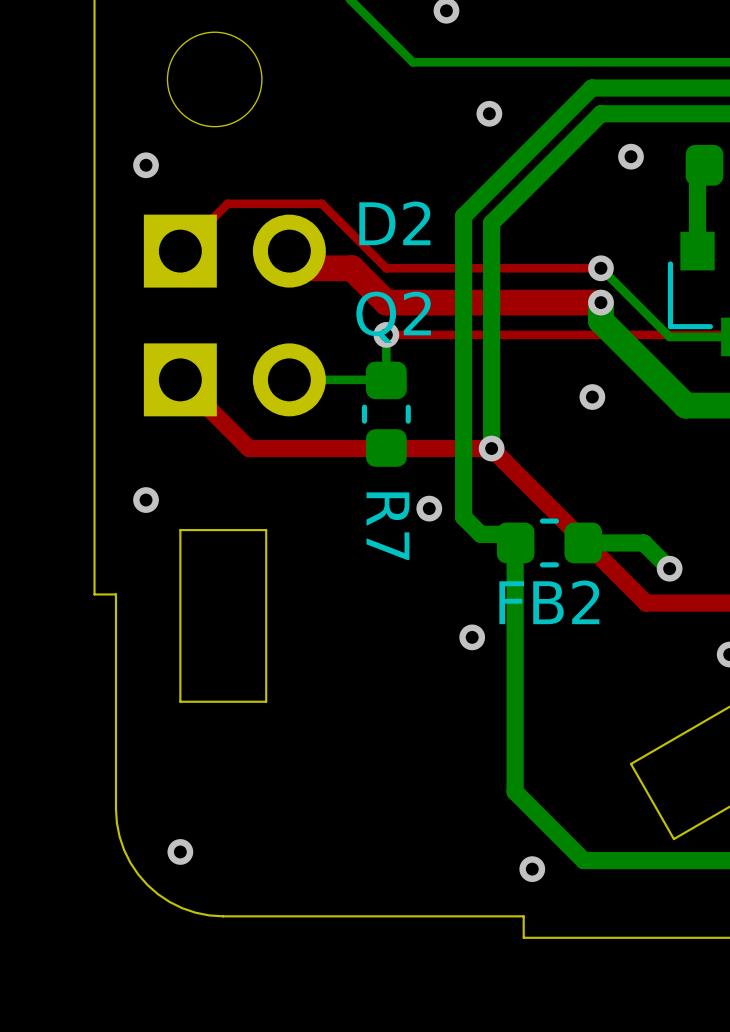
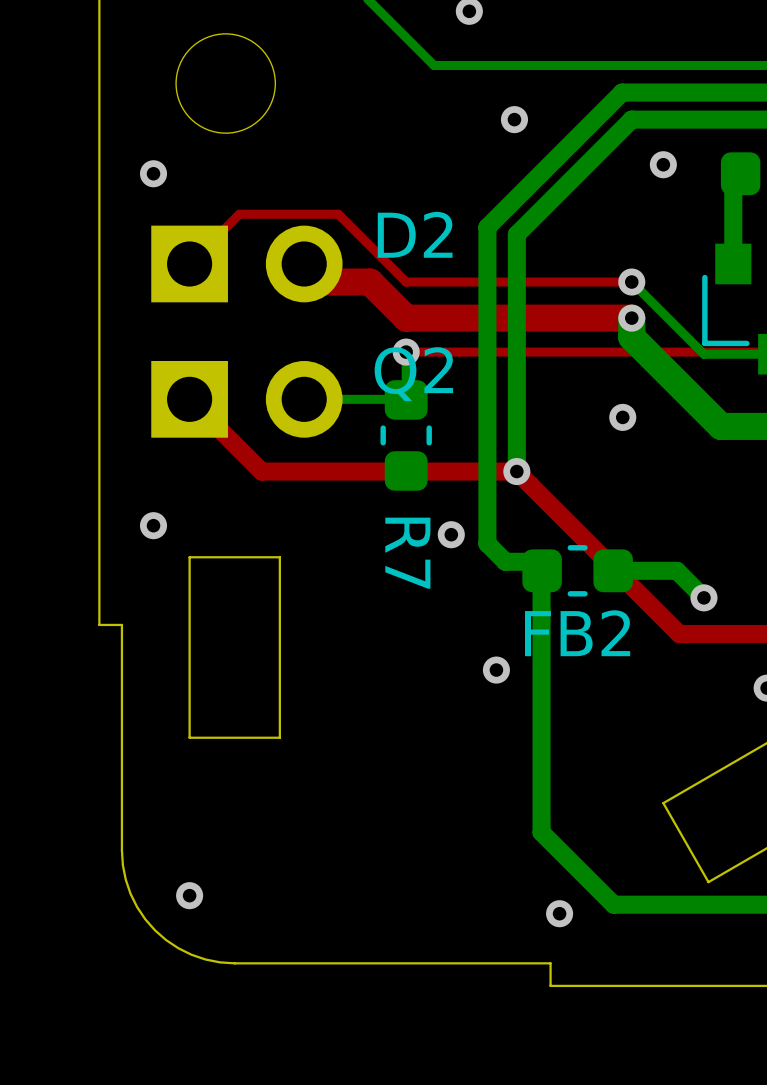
Q2 name position: Q2 (393, 317) -> Q2 (413, 374)

